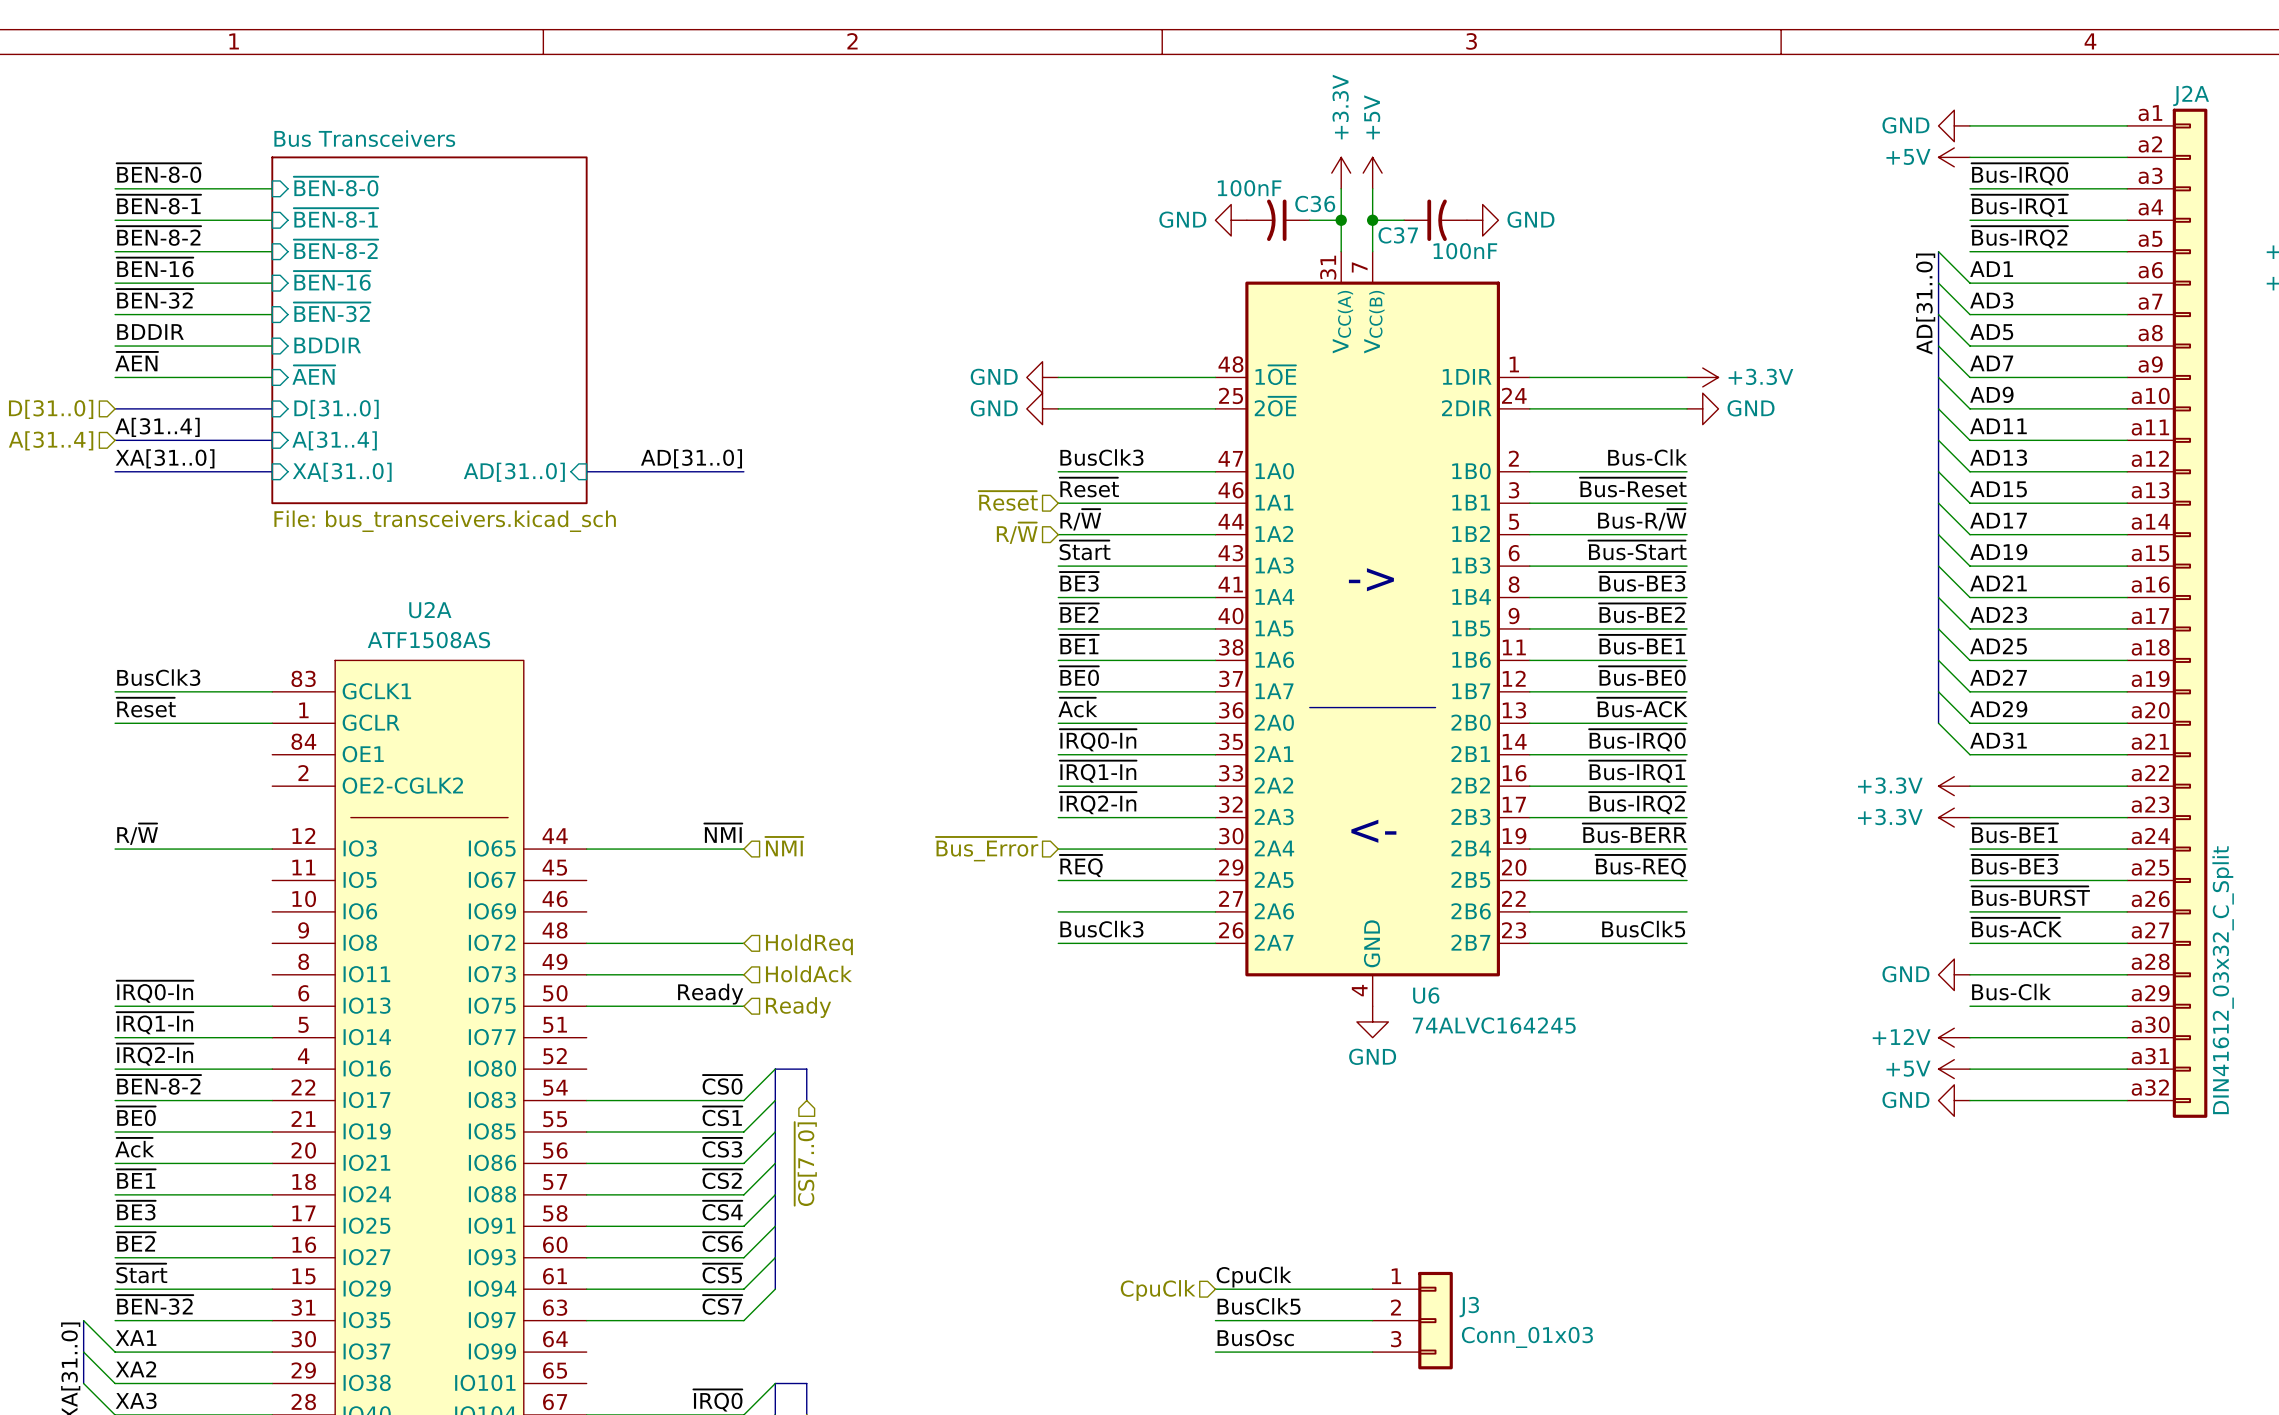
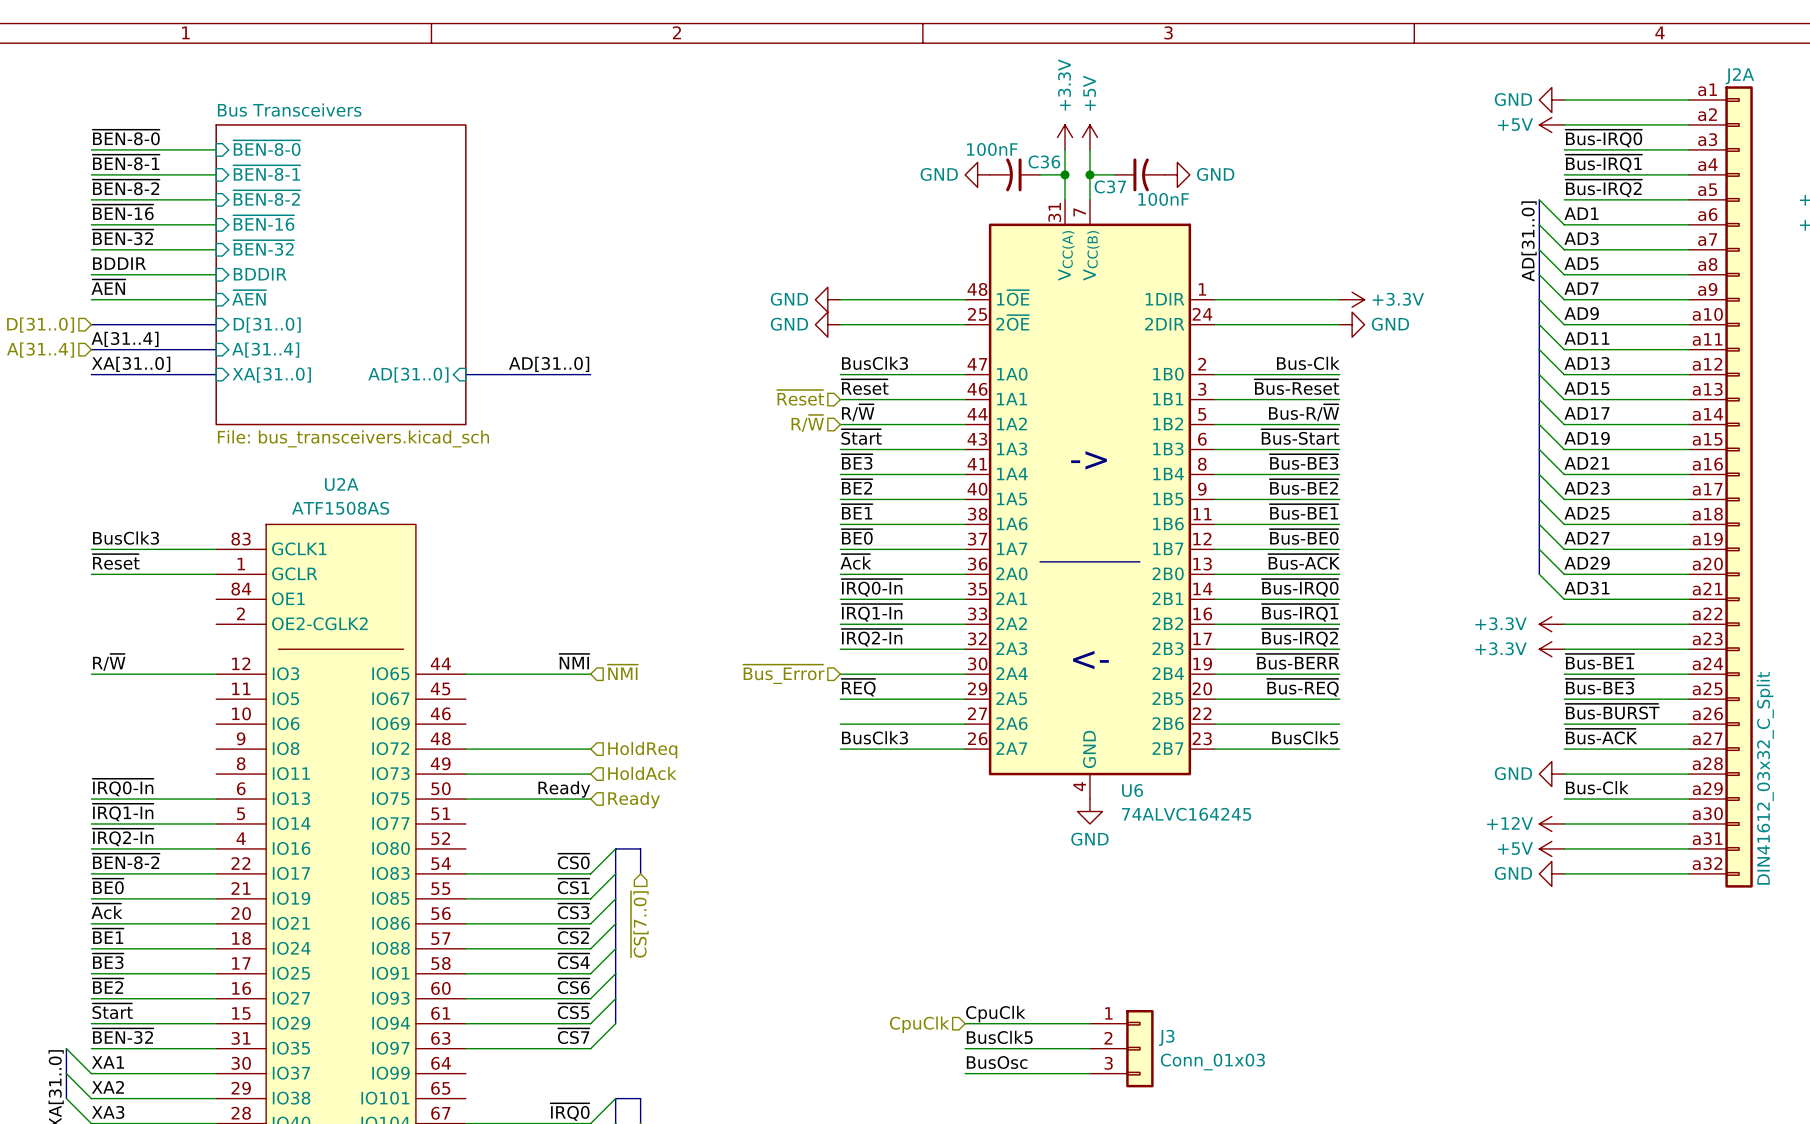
sheet Bus Transceivers: File: bus_transceivers.kicad_sch (429, 330) -> none
sheet Bus Transceivers: none -> File: bus_transceivers.kicad_sch (341, 274)

